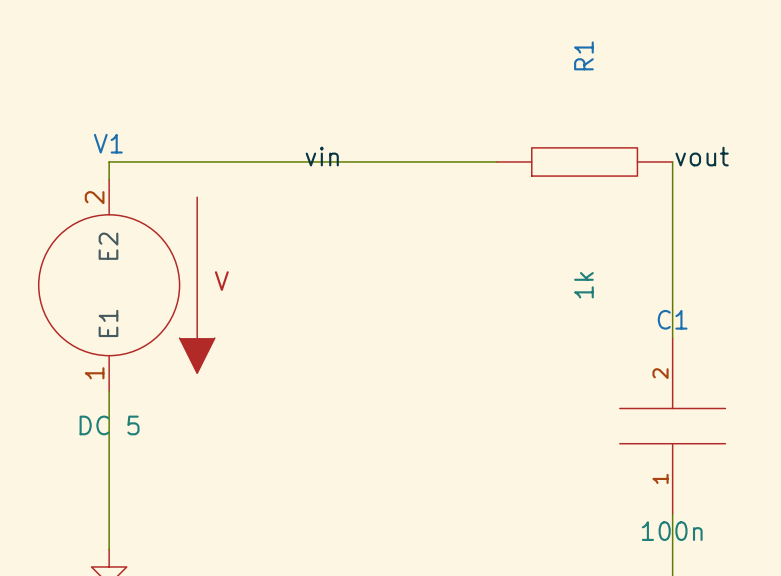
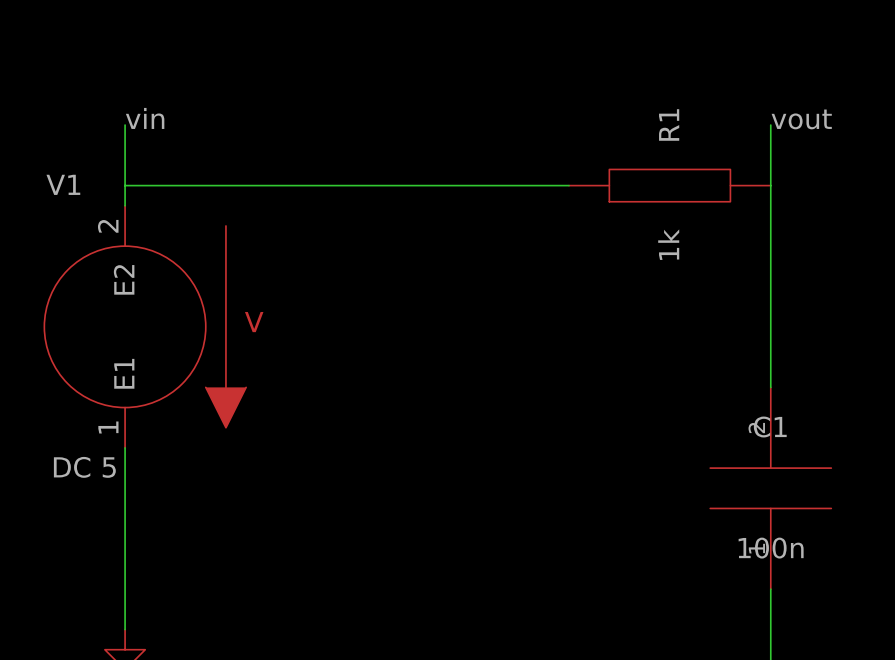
R1 name position: R1 (583, 55) -> R1 (669, 124)
wire: none -> (125, 125) (125, 185)
wire: none -> (770, 125) (770, 185)
V1 name position: V1 (108, 143) -> V1 (63, 184)
label position: vin (322, 156) -> vin (145, 118)
label position: vout (702, 156) -> vout (801, 119)
R1 value position: 1k (583, 285) -> 1k (668, 244)
C1 name position: C1 (672, 319) -> C1 (770, 427)
V1 value position: DC 5 (109, 425) -> DC 5 (84, 467)
C1 value position: 100n (672, 531) -> 100n (771, 548)

